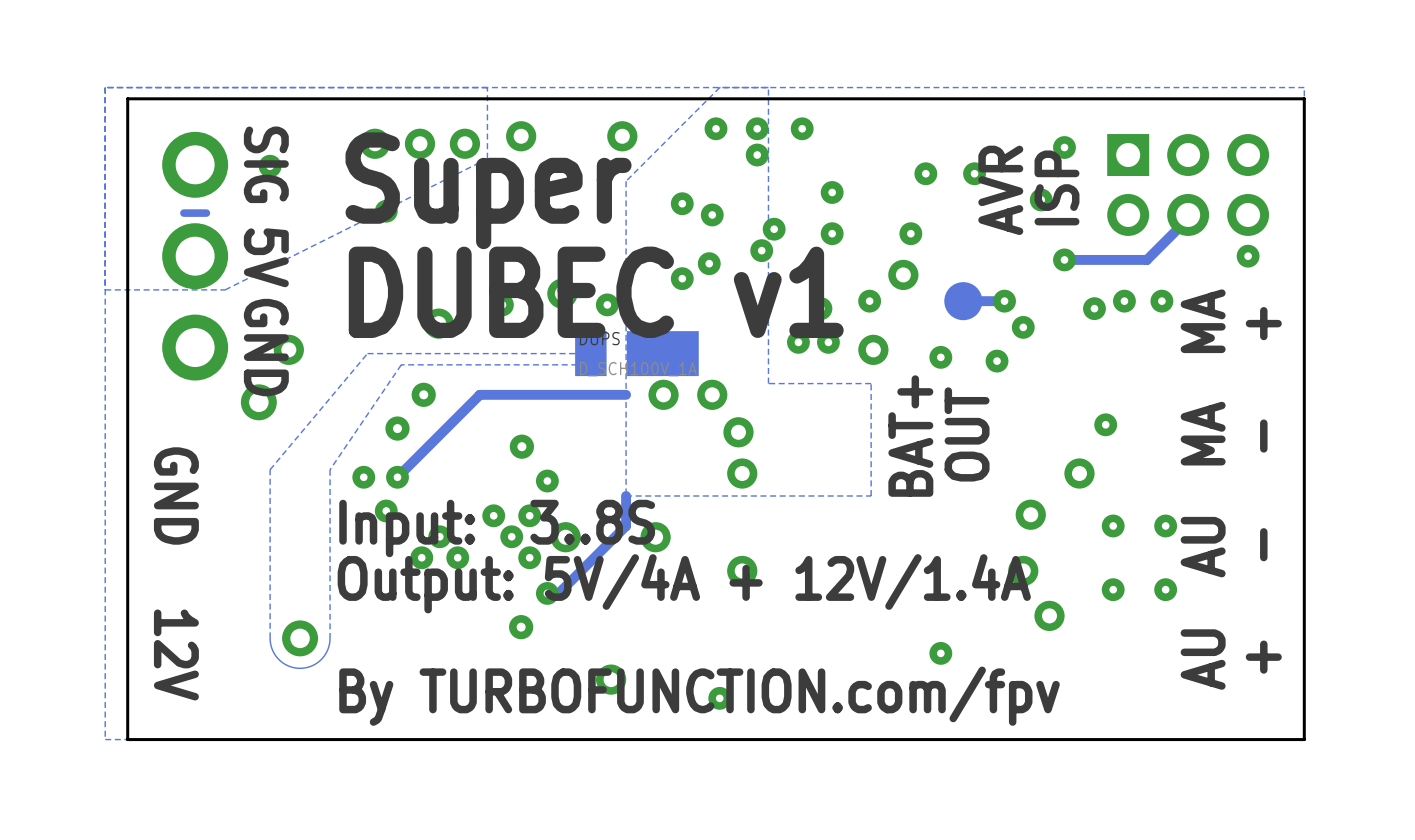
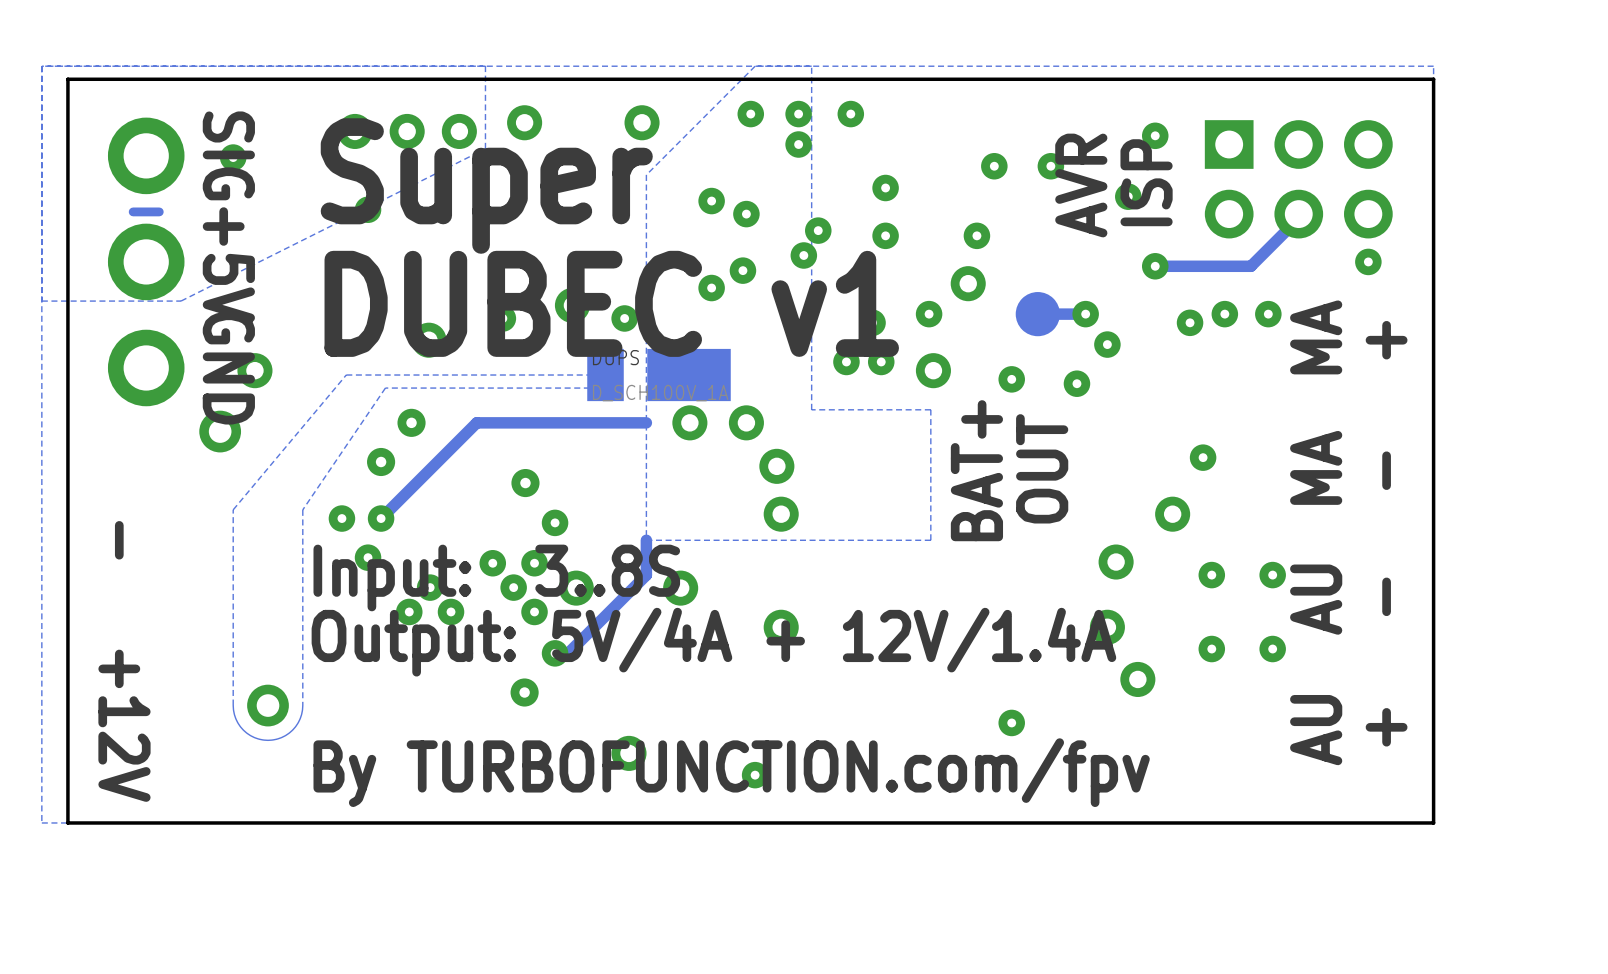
text: 5V (266, 257) -> +5V (228, 264)
text: GND (176, 496) -> - (119, 540)
text: 12V (176, 654) -> +12V (124, 725)

